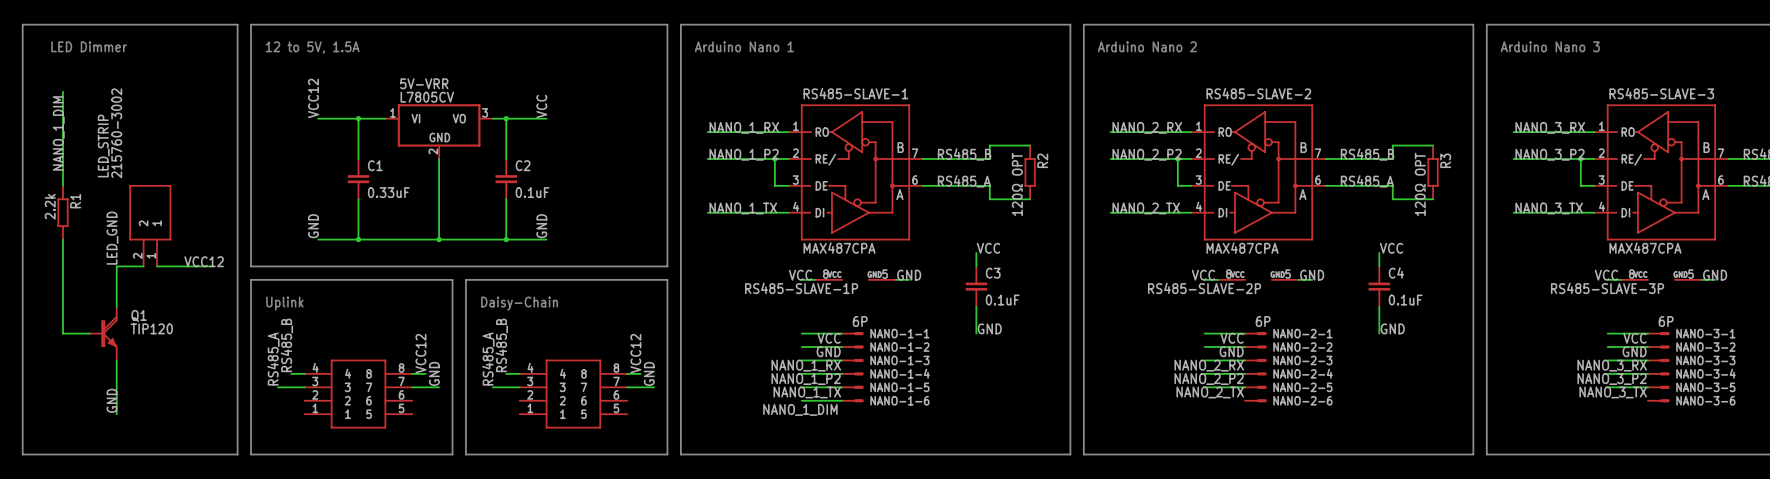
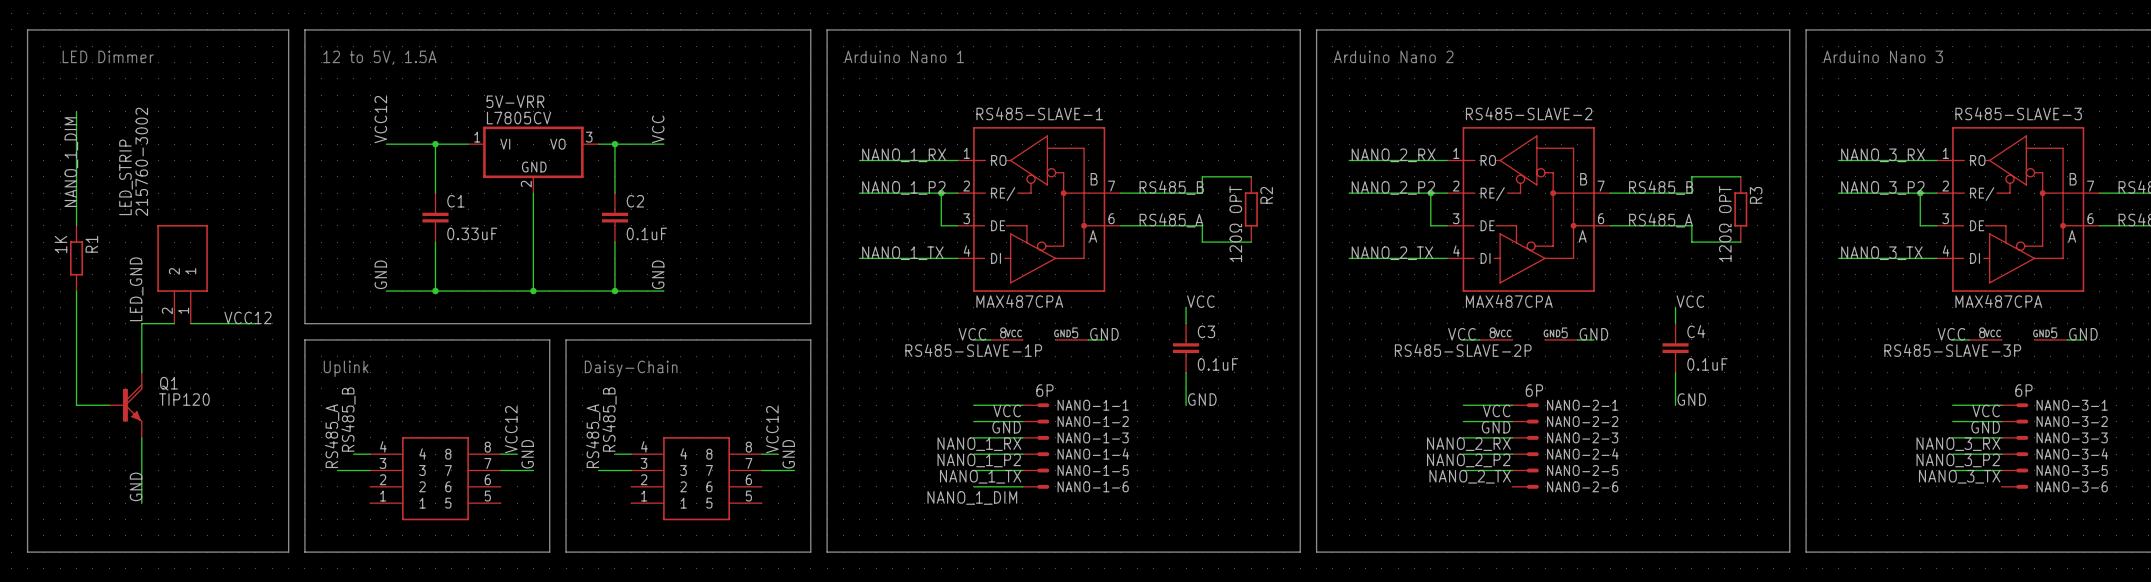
R1 value: 2.2k (50, 206) -> 1K (61, 244)

